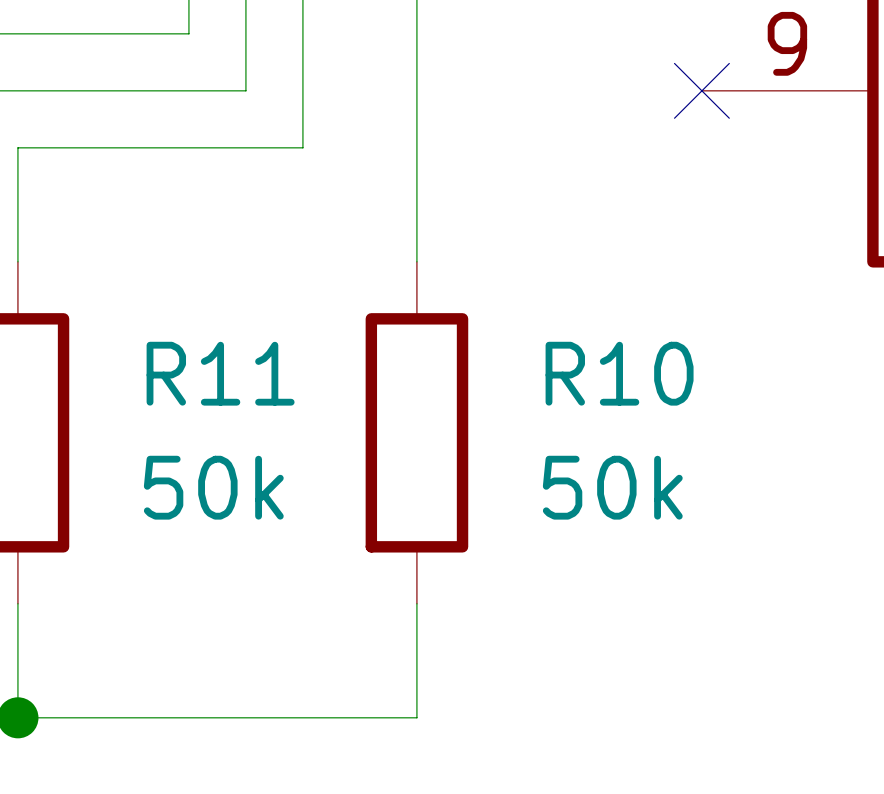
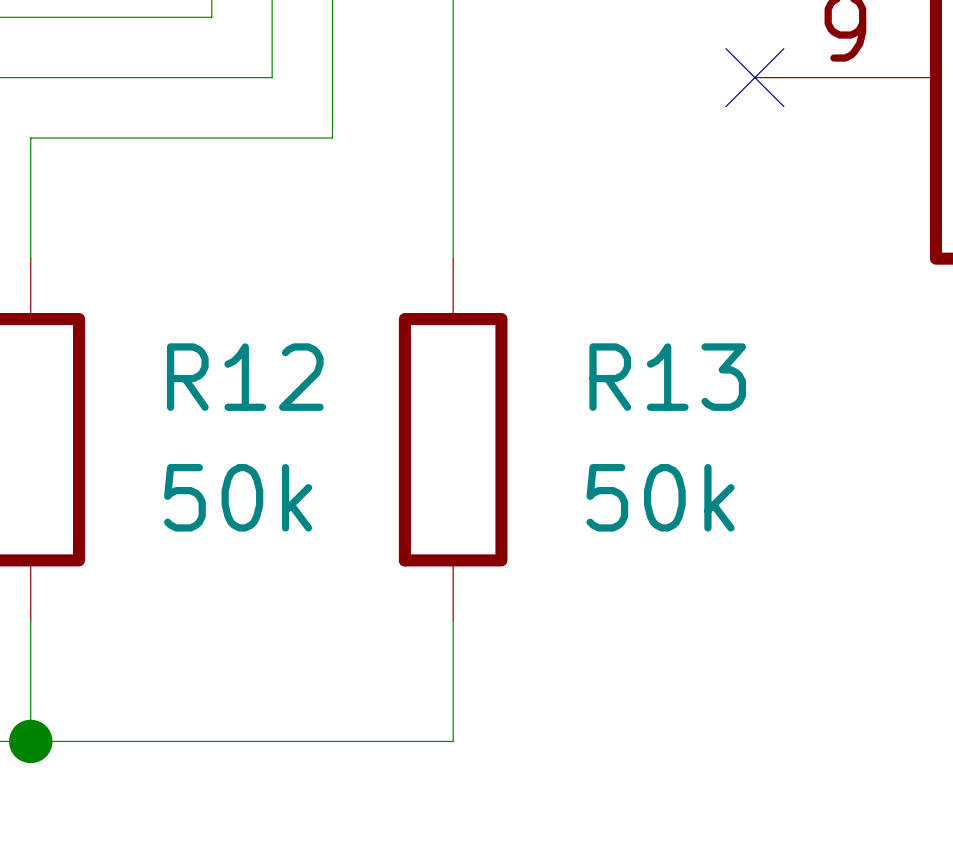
R11 name: R11 (220, 373) -> R12 (245, 377)
R10 name: R10 (619, 373) -> R13 (667, 377)

